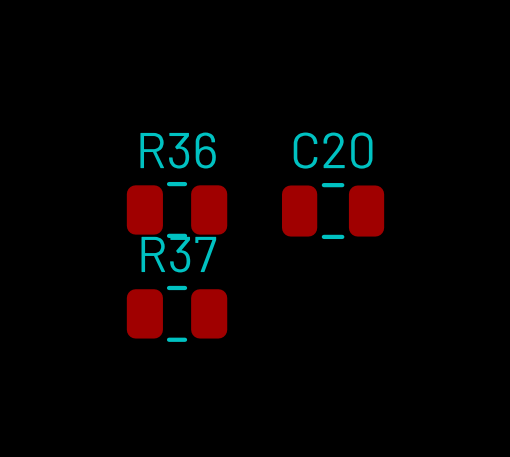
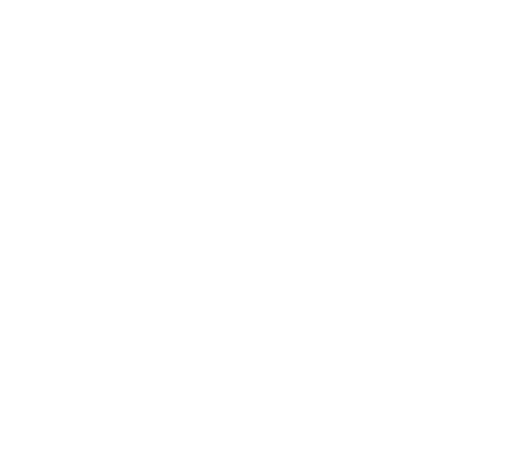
R36: (177, 209) -> none
C20: (333, 211) -> none
R37: (177, 313) -> none

